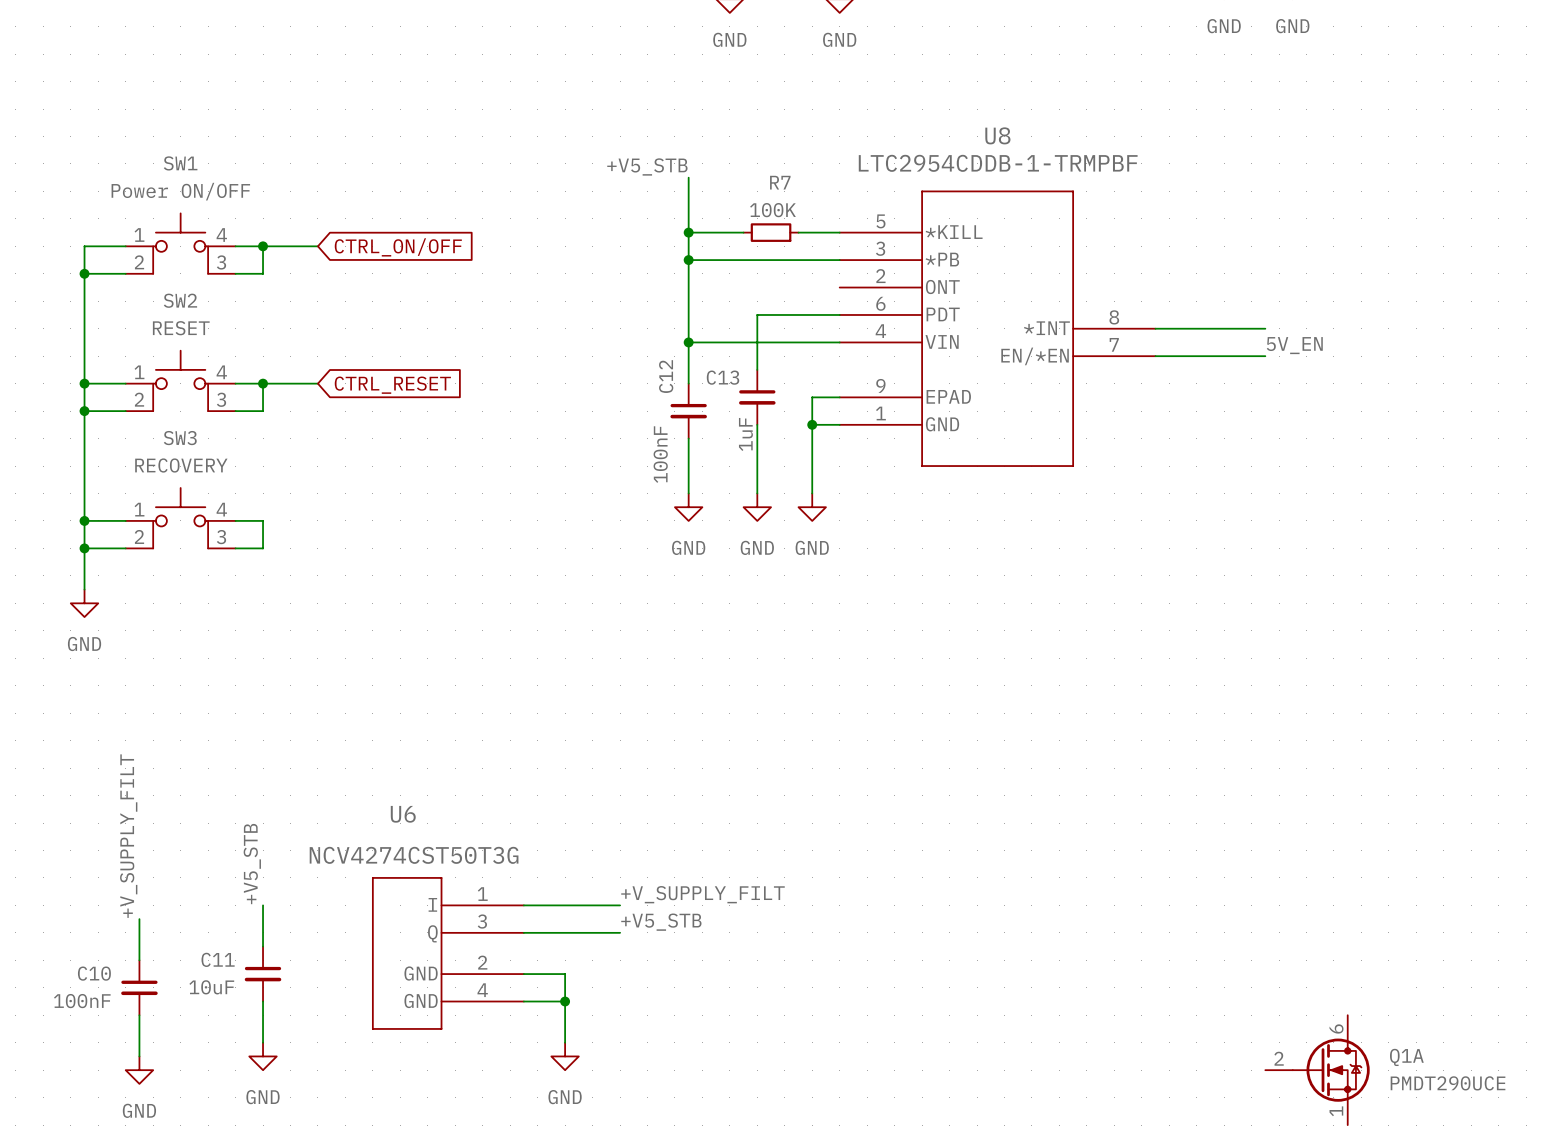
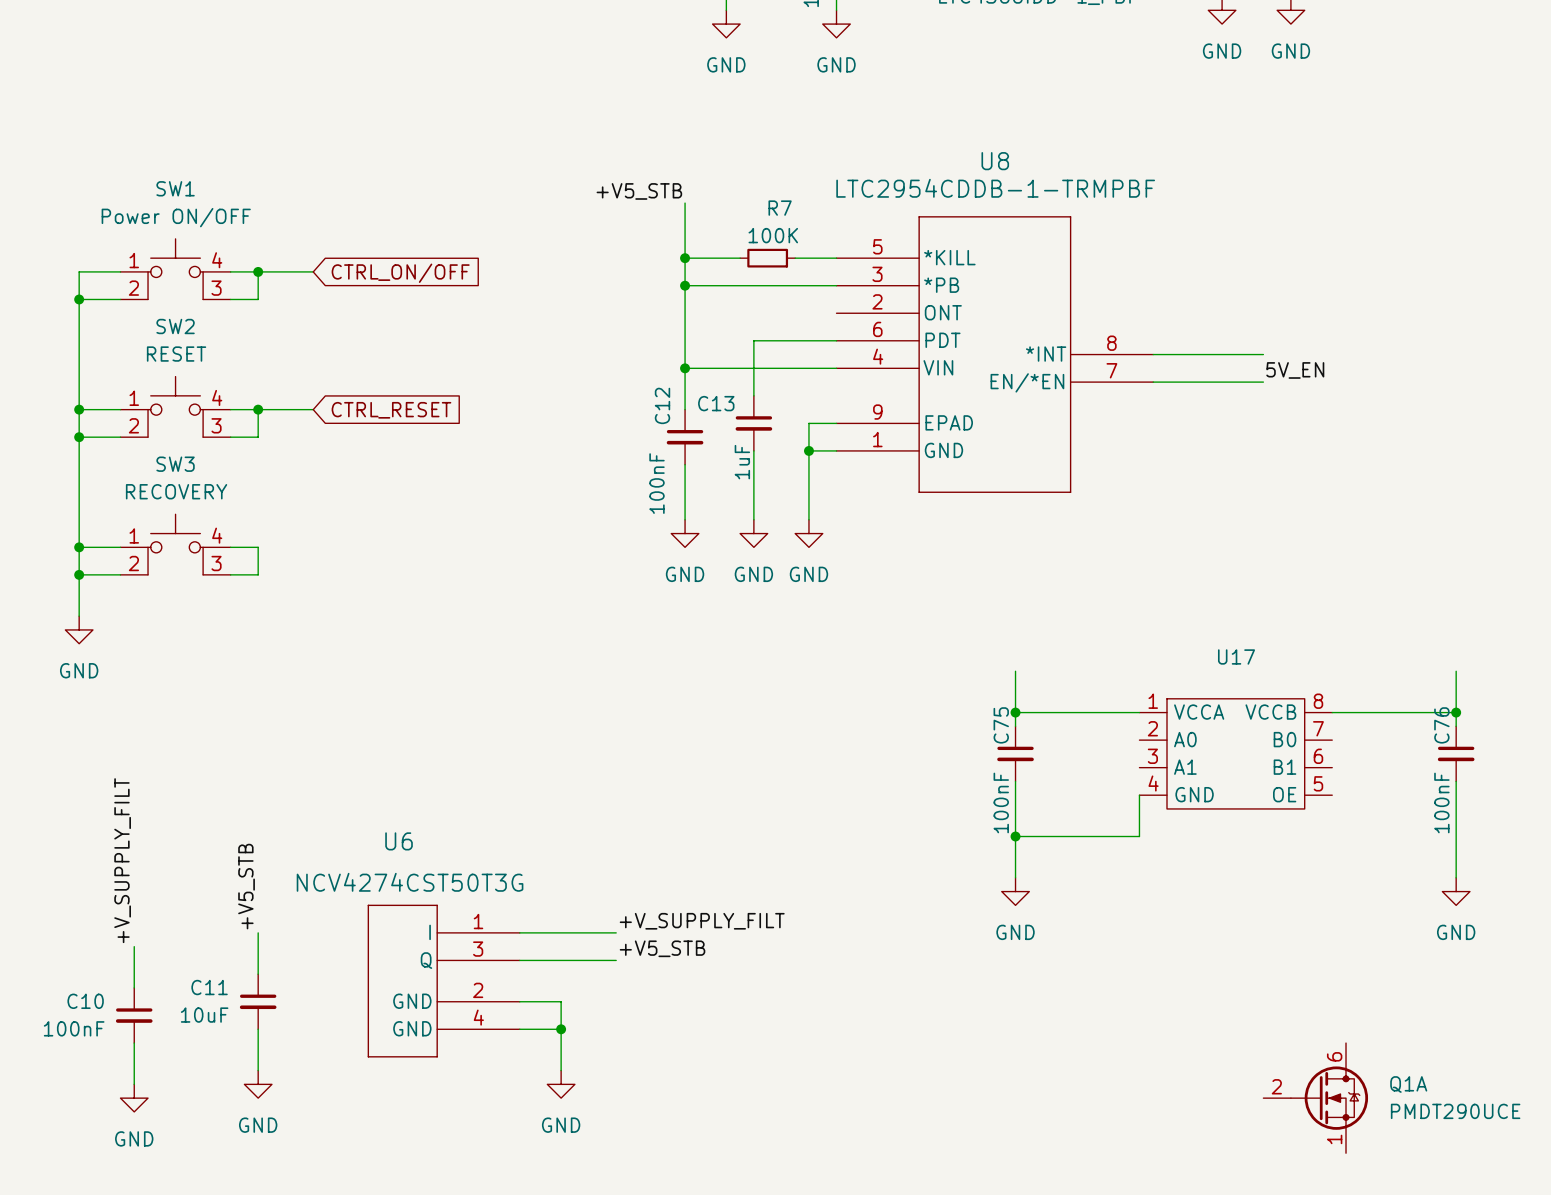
wire: none -> (1015, 671) (1015, 726)
wire: none -> (1456, 671) (1456, 726)
wire: none -> (1015, 712) (1139, 712)
junction: none -> (1015, 712)
wire: none -> (1332, 712) (1456, 712)
junction: none -> (1456, 712)
C75: none -> 100nF (1015, 753)
U17: none -> (1235, 753)
C76: none -> 100nF (1456, 753)
wire: none -> (1015, 781) (1015, 877)
wire: none -> (1456, 781) (1456, 877)
wire: none -> (1139, 795) (1139, 836) (1015, 836)
junction: none -> (1015, 836)
power symbol: none -> GND (1015, 891)
power symbol: none -> GND (1456, 891)

